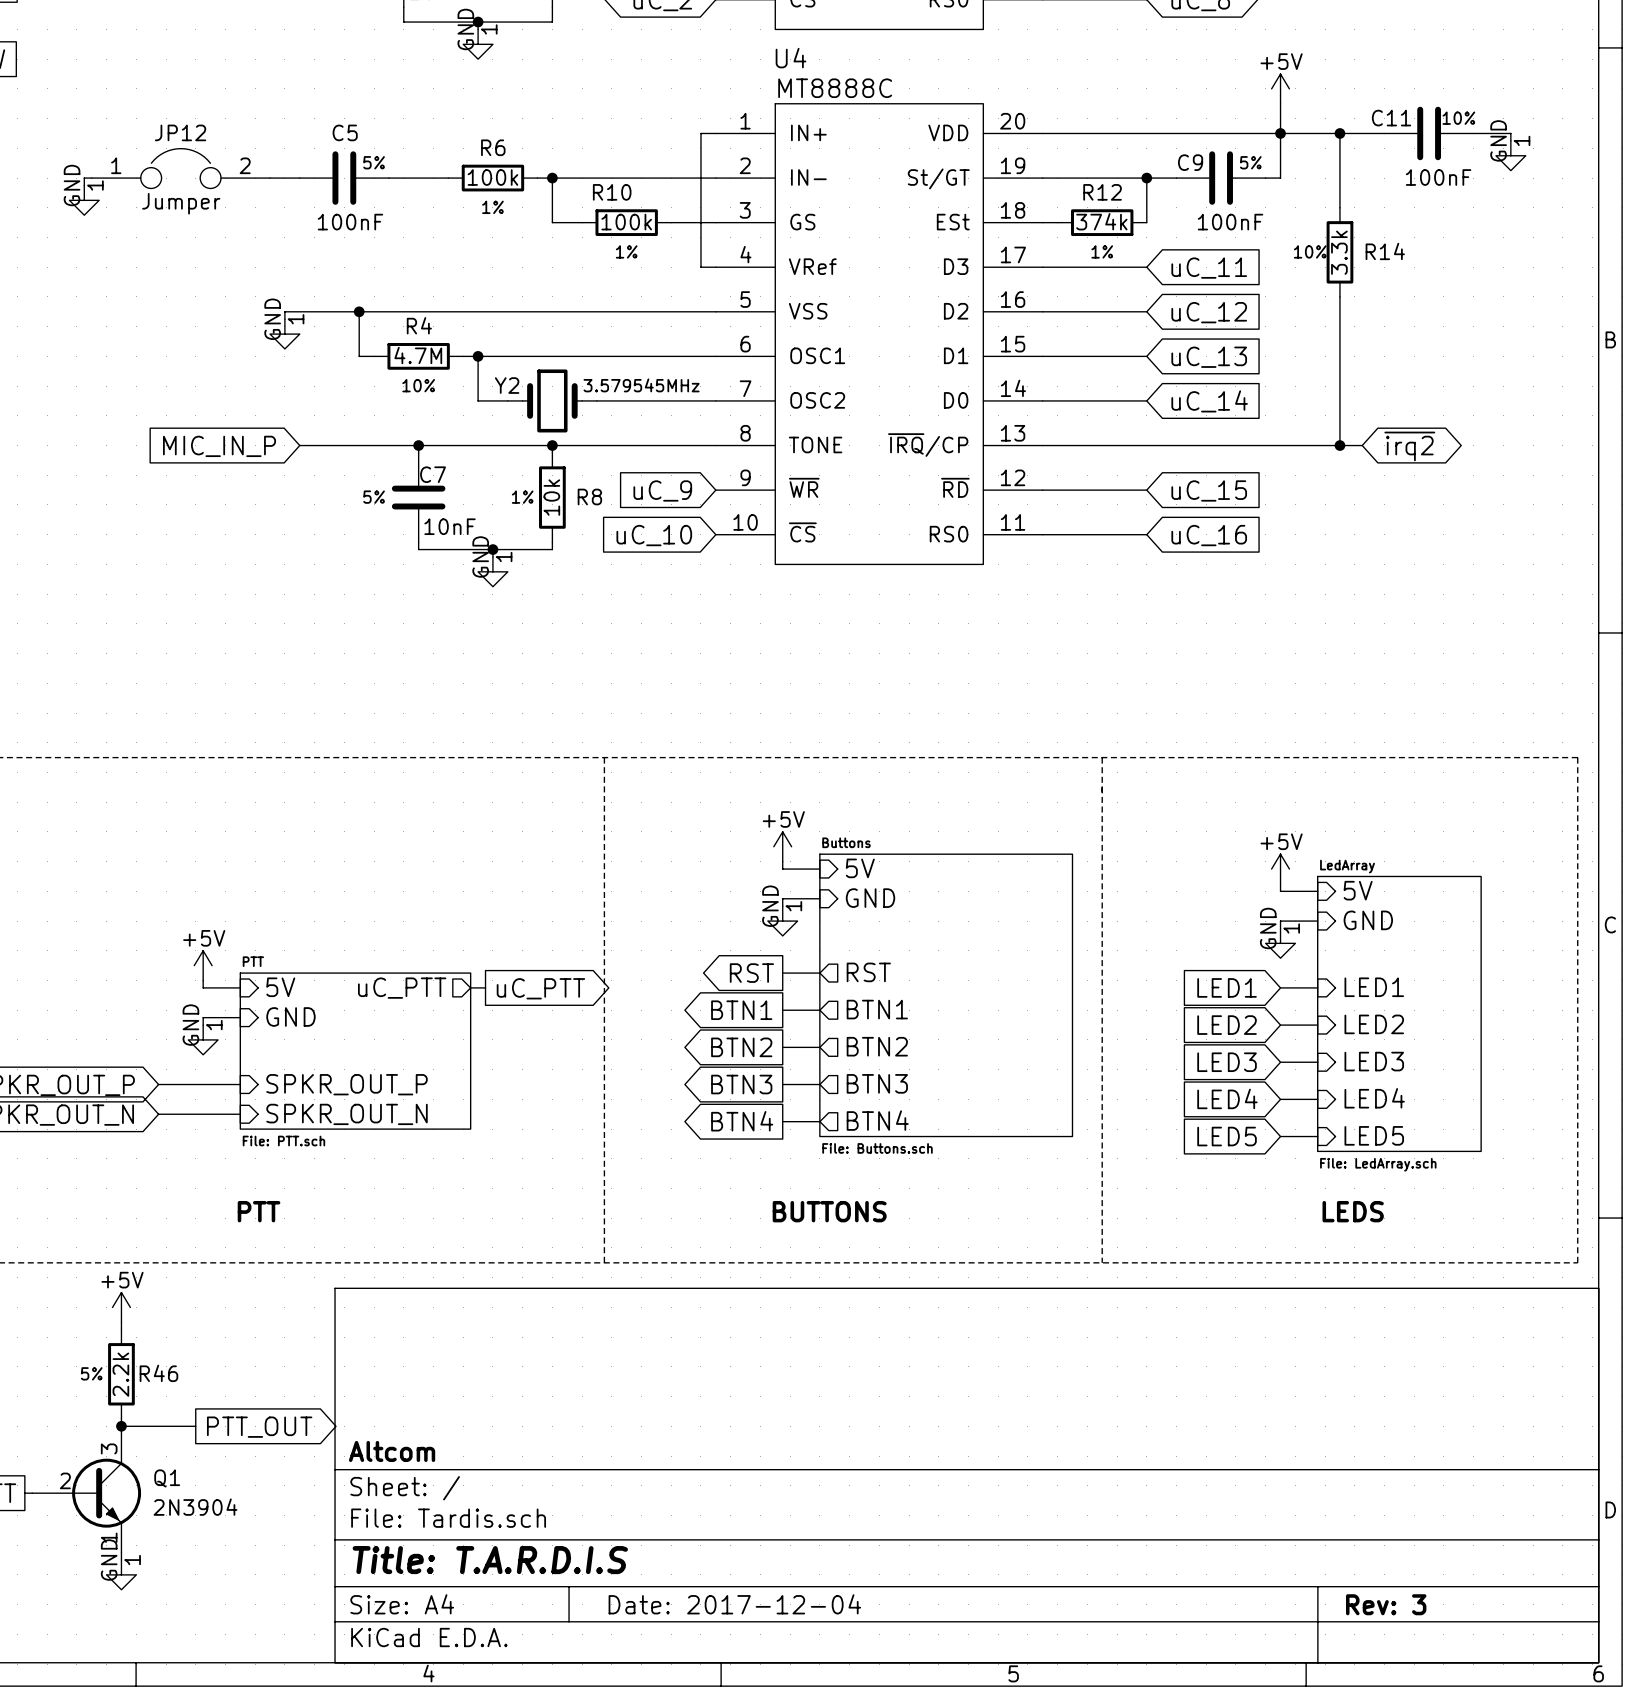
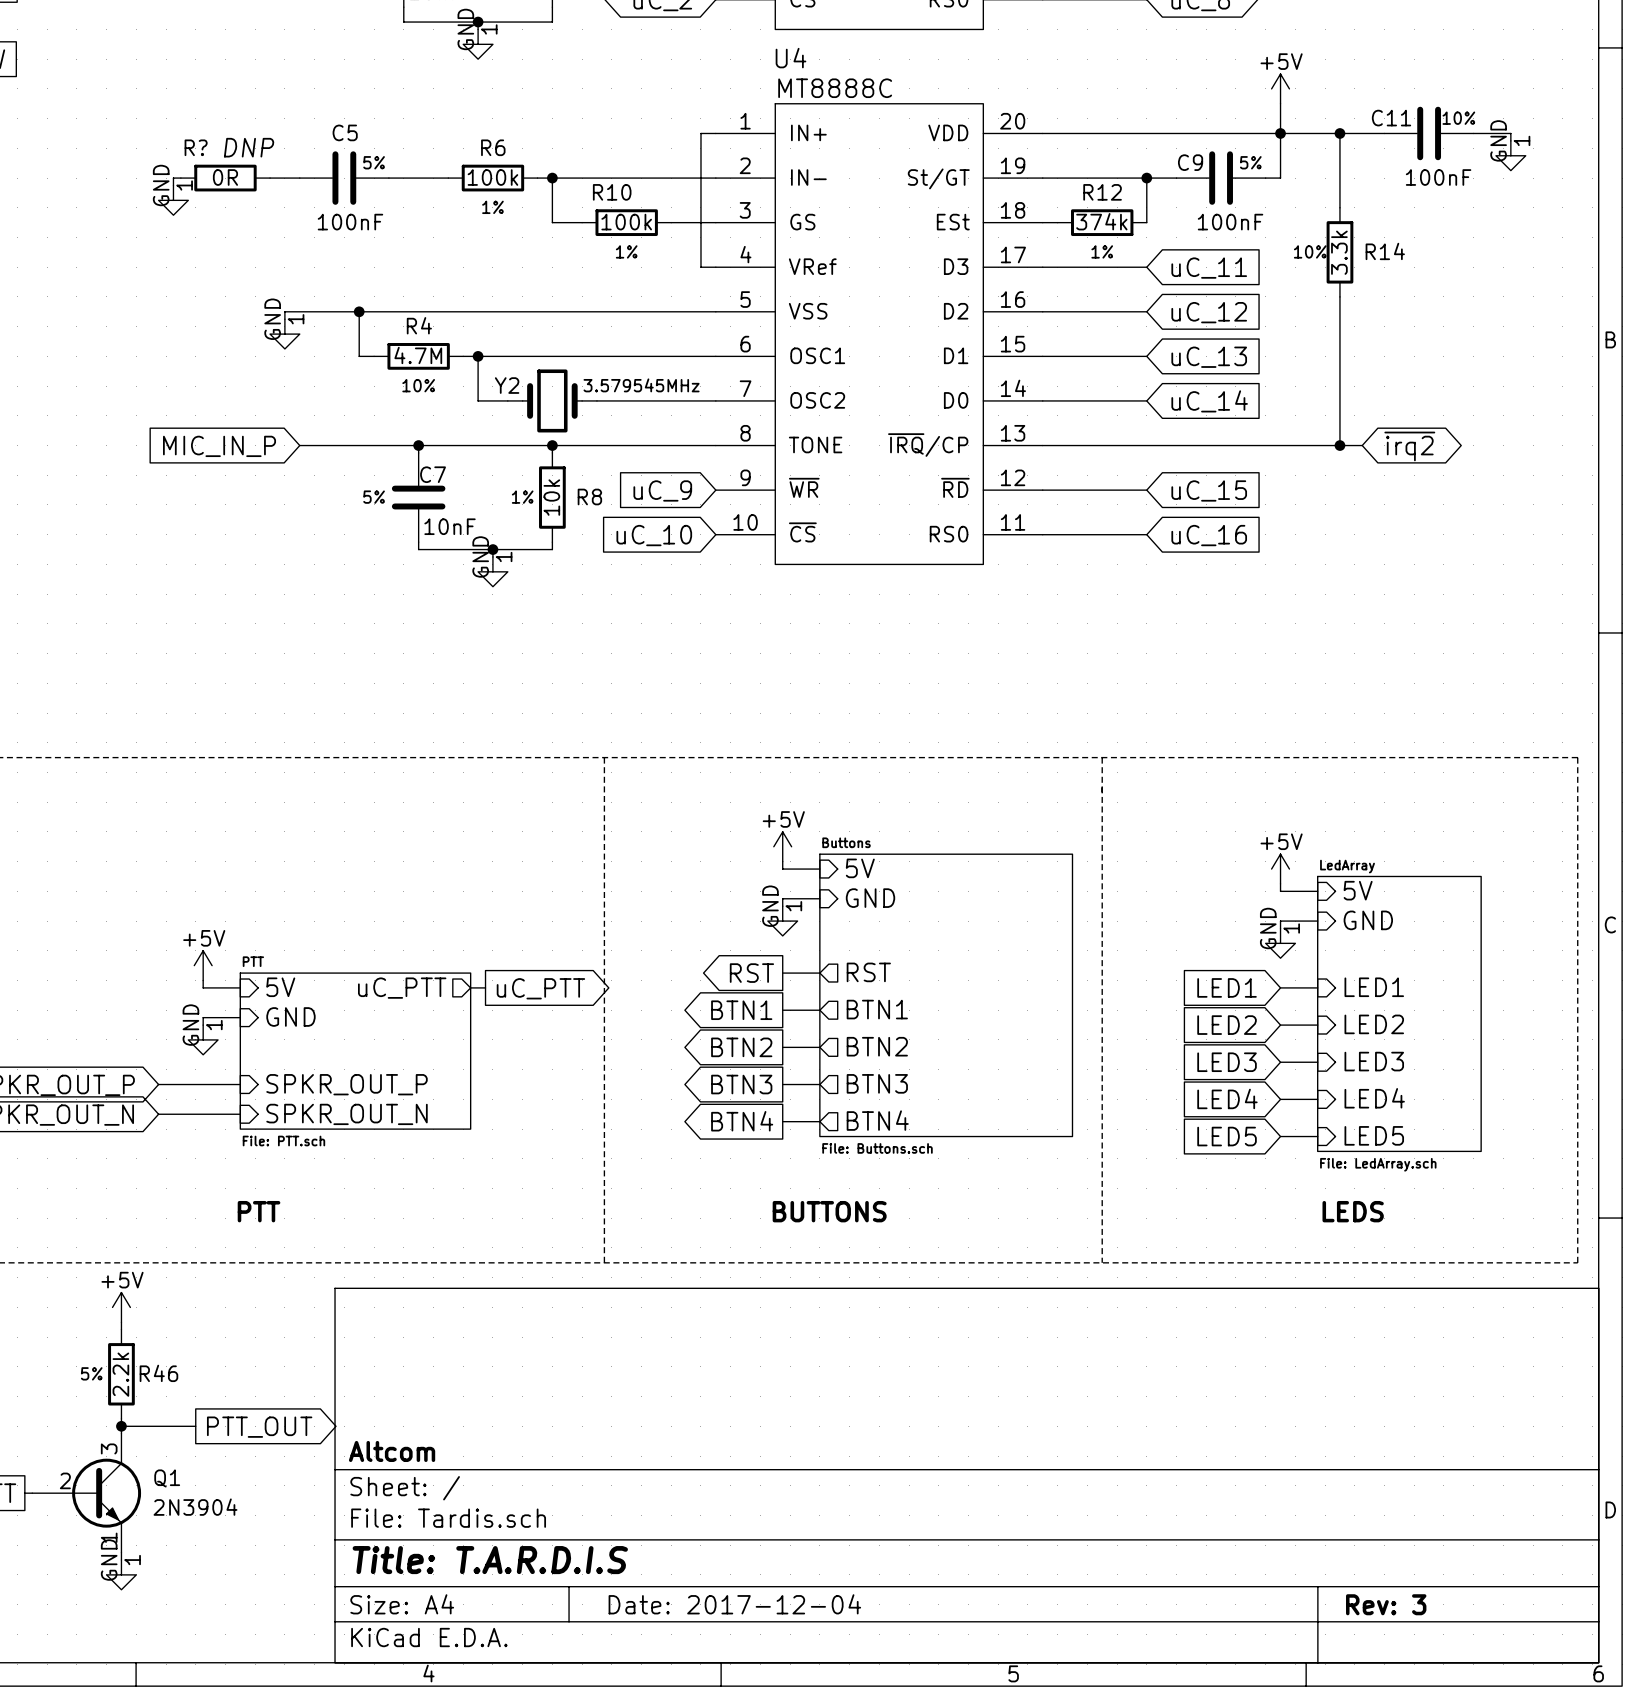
JP12: Jumper (180, 168) -> none
wire: (91, 178) (84, 178) (84, 185) -> (180, 178) (173, 178) (173, 185)
R?: none -> 0R (225, 178)
power symbol position: (84, 200) -> (173, 200)

